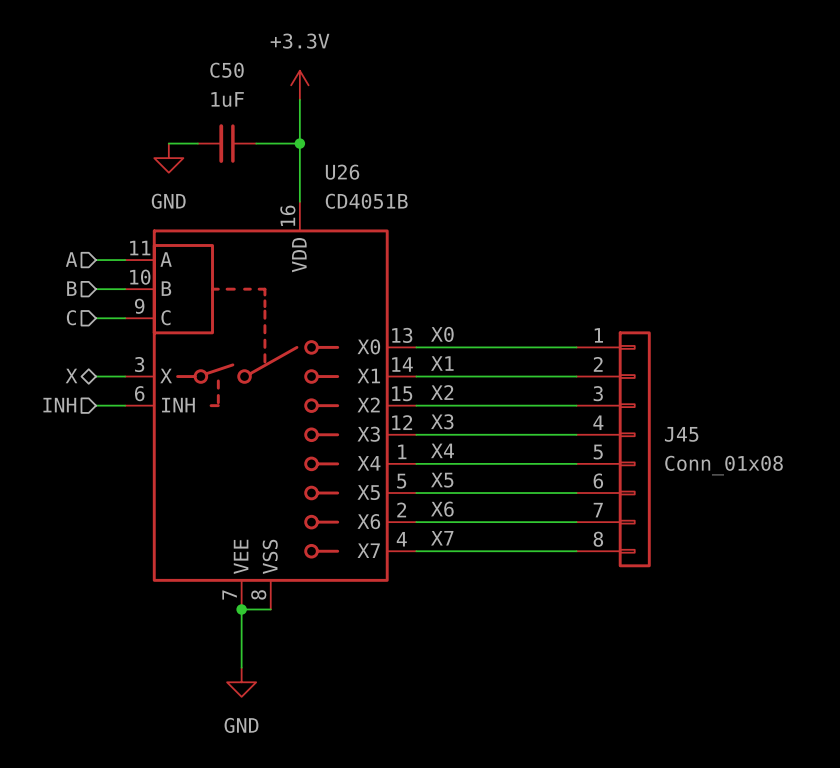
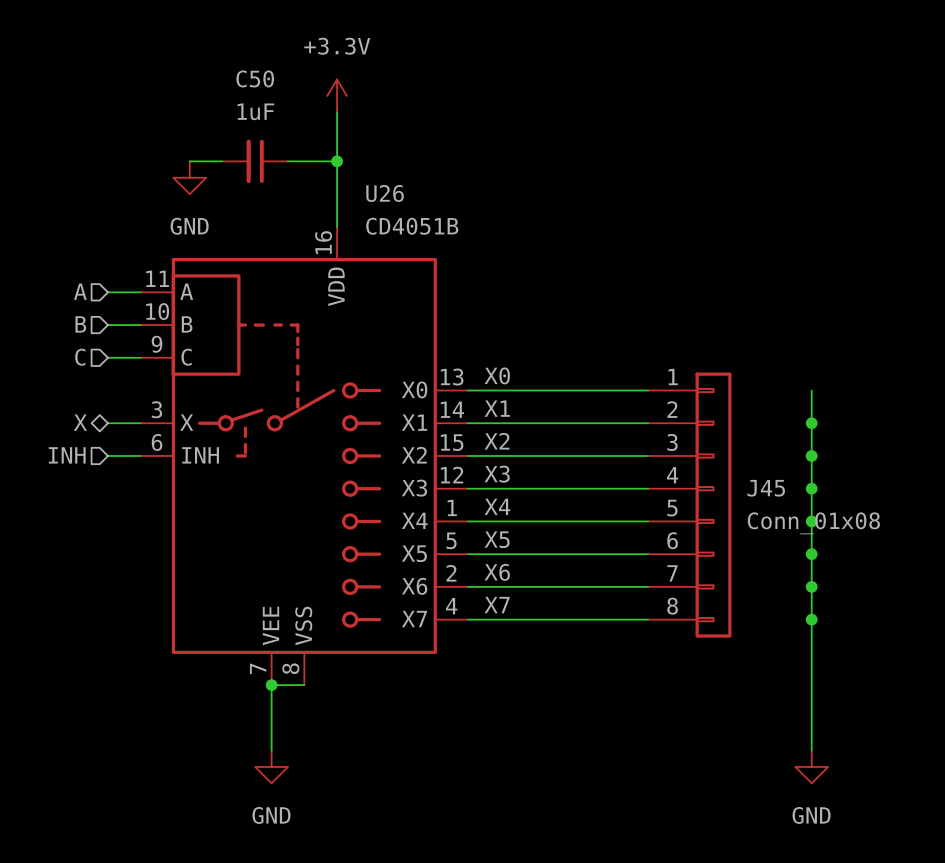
wire: none -> (811, 390) (811, 750)
junction: none -> (811, 423)
junction: none -> (811, 455)
junction: none -> (811, 488)
junction: none -> (811, 521)
junction: none -> (811, 554)
junction: none -> (811, 586)
junction: none -> (811, 619)
power symbol: none -> GND (811, 766)

